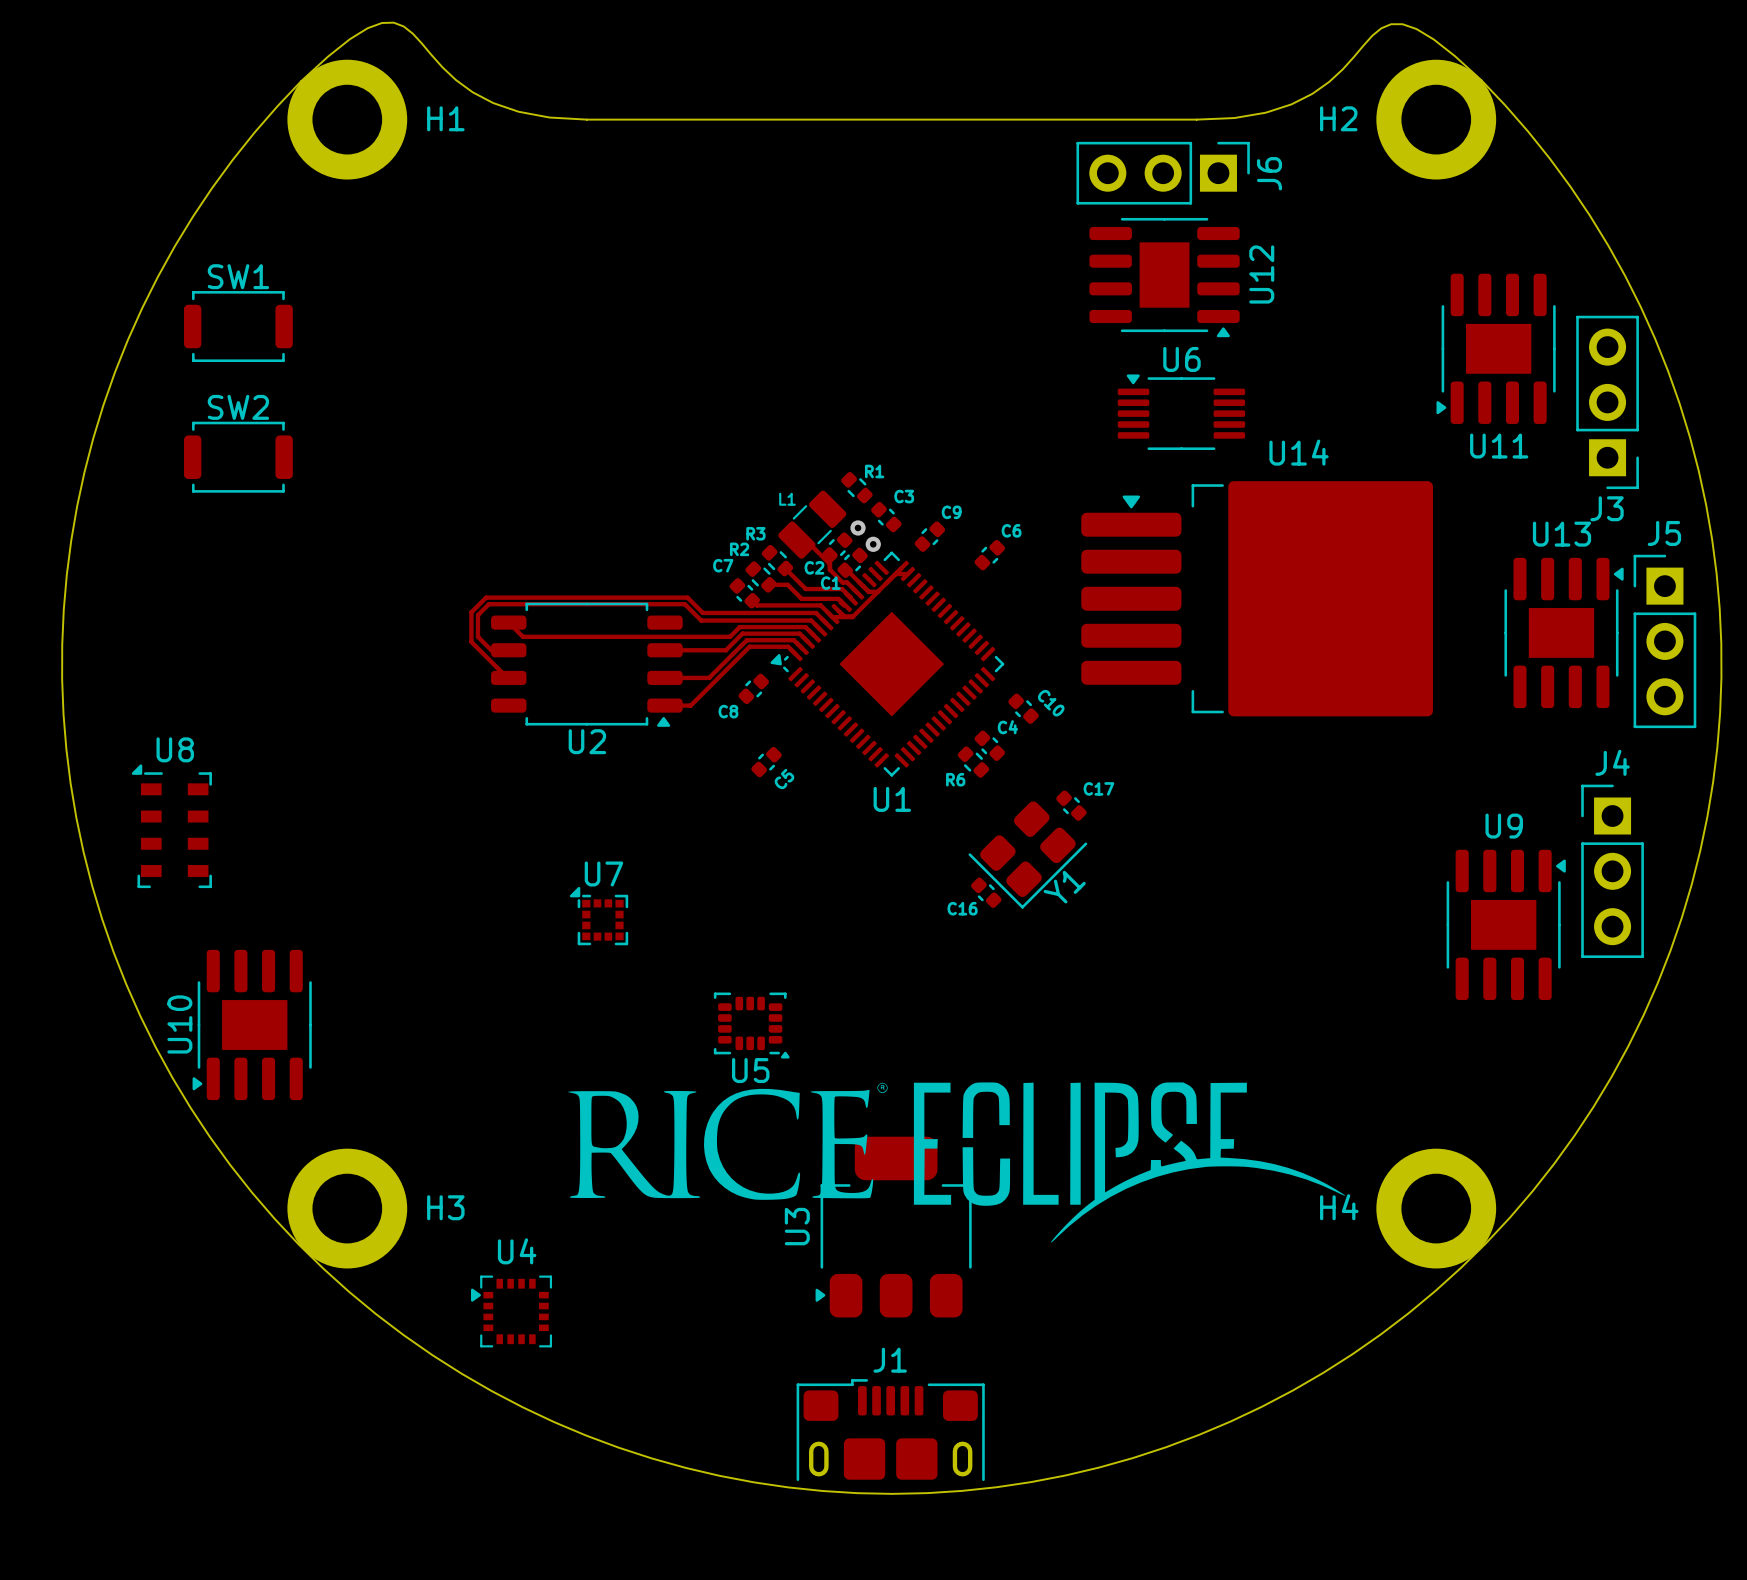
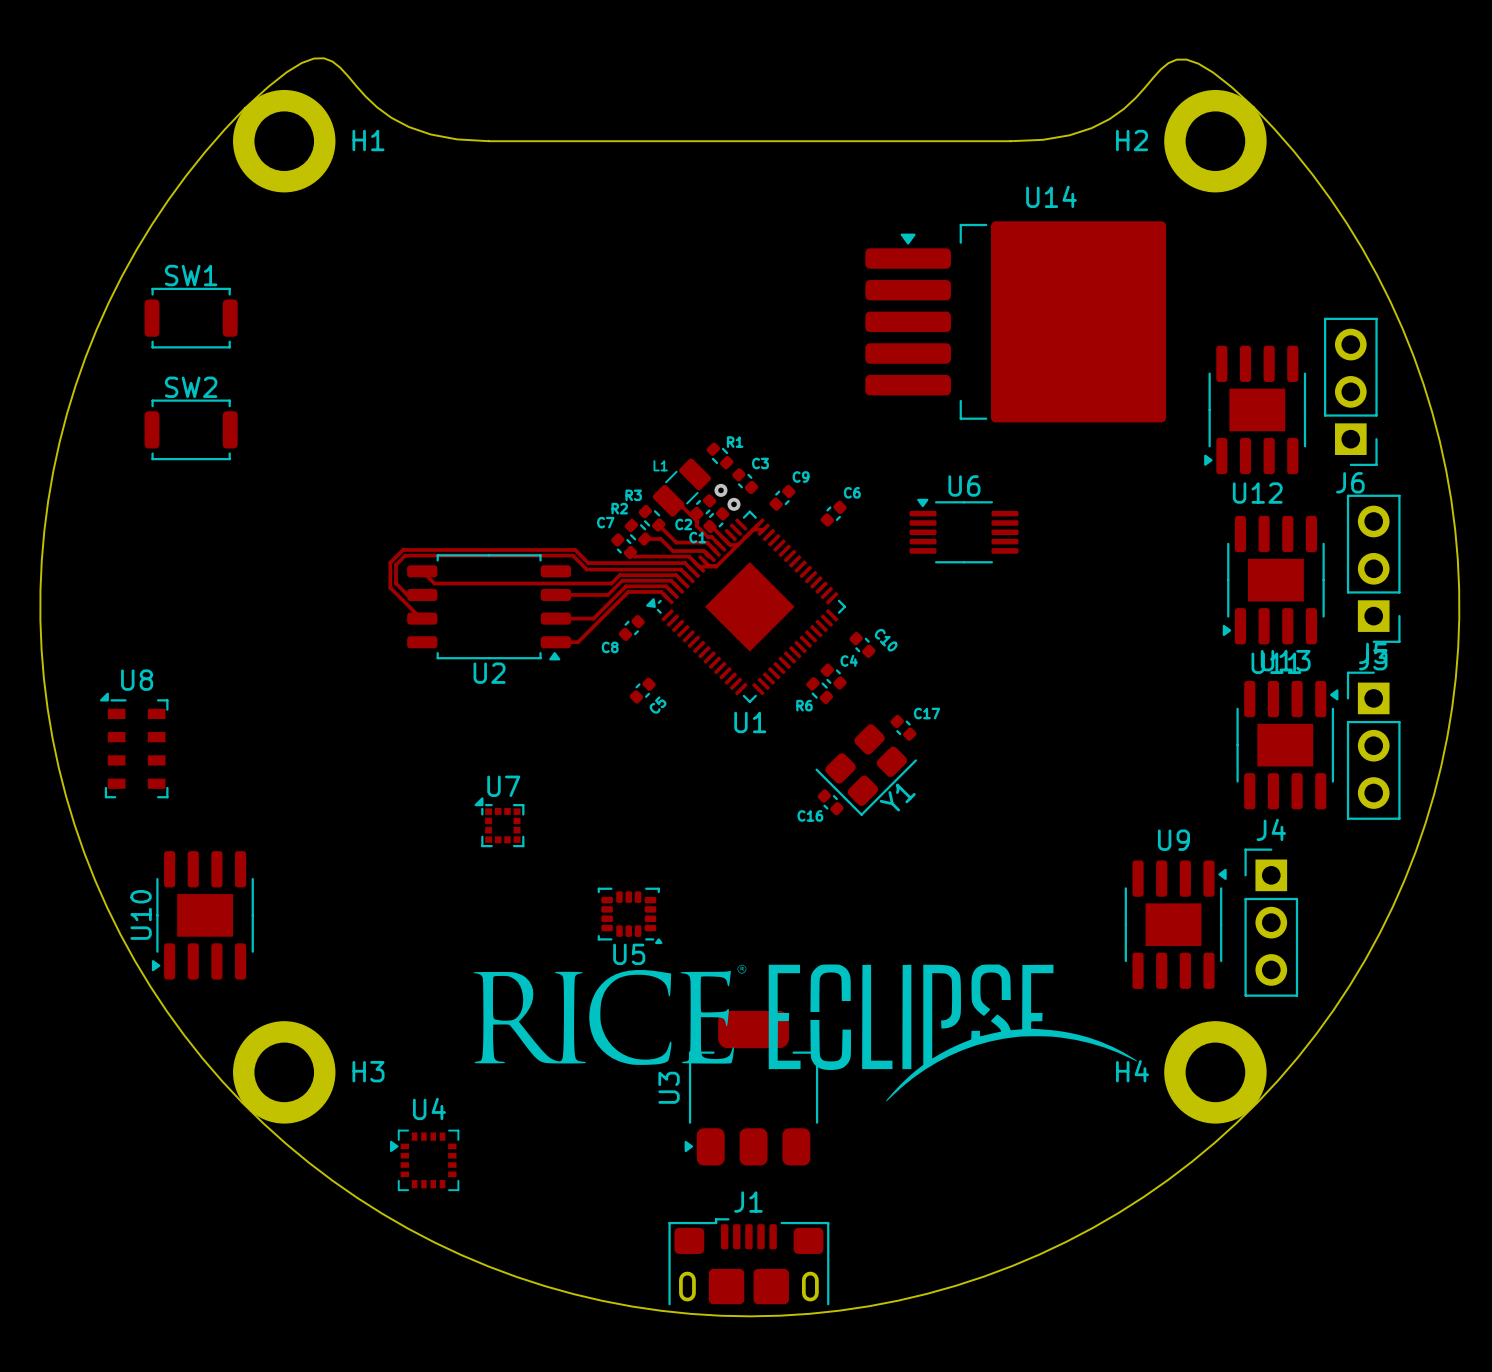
J6 rotation: 0° (1163, 173) -> 90° clockwise (1350, 391)
J6 position: (1163, 173) -> (1350, 391)
U12 rotation: 0° (1164, 277) -> 90° clockwise (1255, 409)
U12 position: (1164, 277) -> (1255, 409)
U11 position: (1496, 348) -> (1273, 580)
J3 position: (1607, 402) -> (1373, 568)
U6 position: (1181, 412) -> (964, 531)
U14 position: (1257, 598) -> (1015, 321)
U13 position: (1564, 632) -> (1287, 745)
J5 position: (1664, 641) -> (1373, 745)
J4 position: (1612, 871) -> (1271, 922)
U9 position: (1506, 924) -> (1175, 924)

